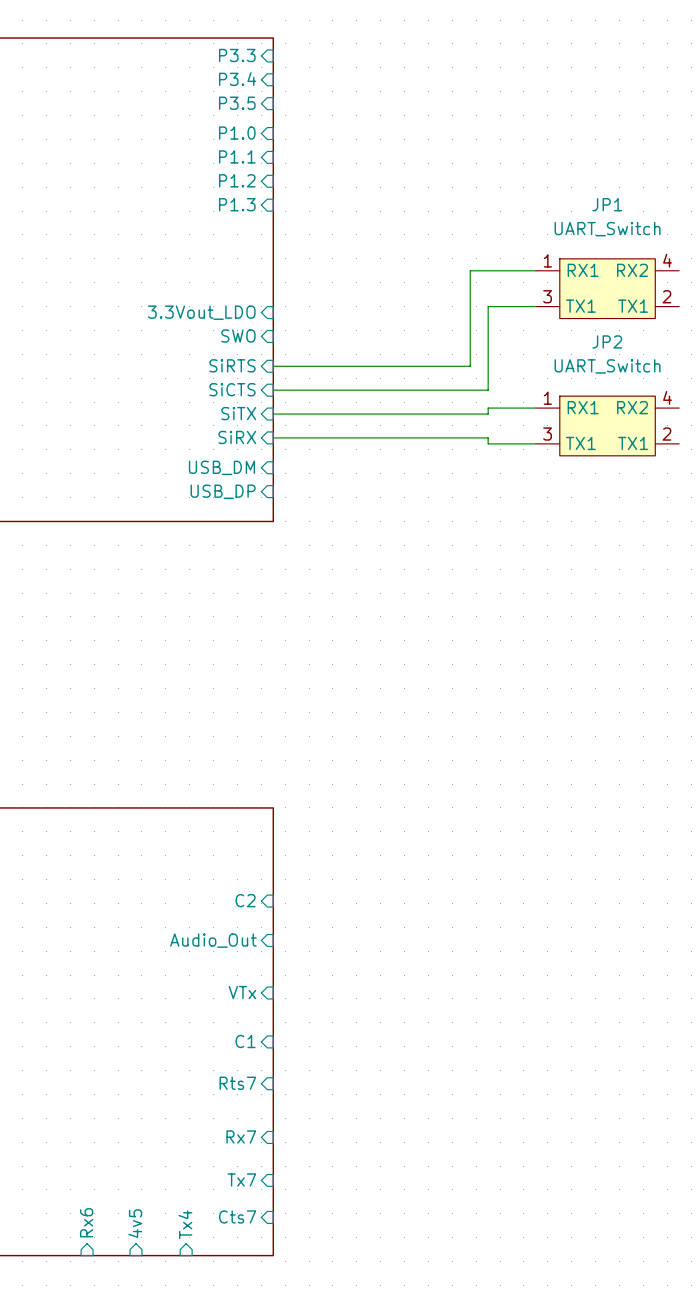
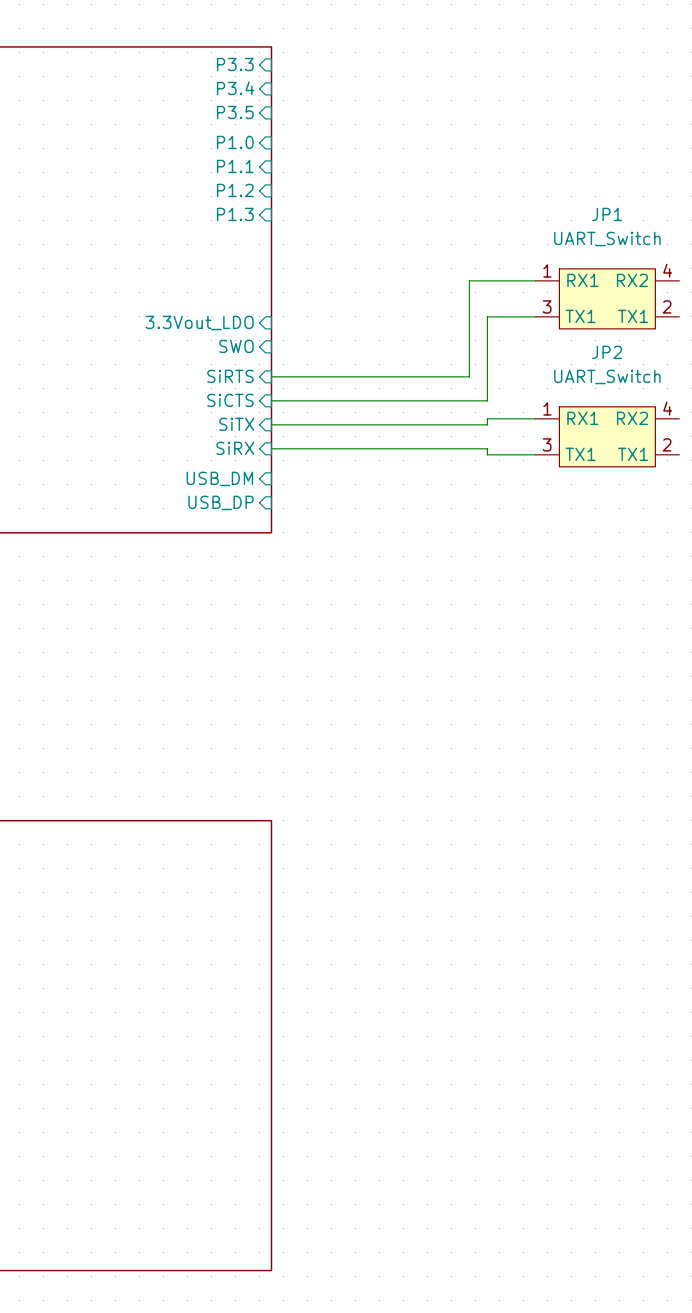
sheet pin: C2 (245, 900) -> none
sheet pin: Audio_Out (213, 940) -> none
sheet pin: VTx (242, 992) -> none
sheet pin: C1 (245, 1041) -> none
sheet pin: Rts7 (237, 1083) -> none
sheet pin: Rx7 (241, 1136) -> none
sheet pin: Tx7 (241, 1179) -> none
sheet pin: Cts7 (237, 1216) -> none
sheet pin: Rx6 (86, 1222) -> none
sheet pin: 4v5 (135, 1223) -> none
sheet pin: Tx4 (185, 1224) -> none

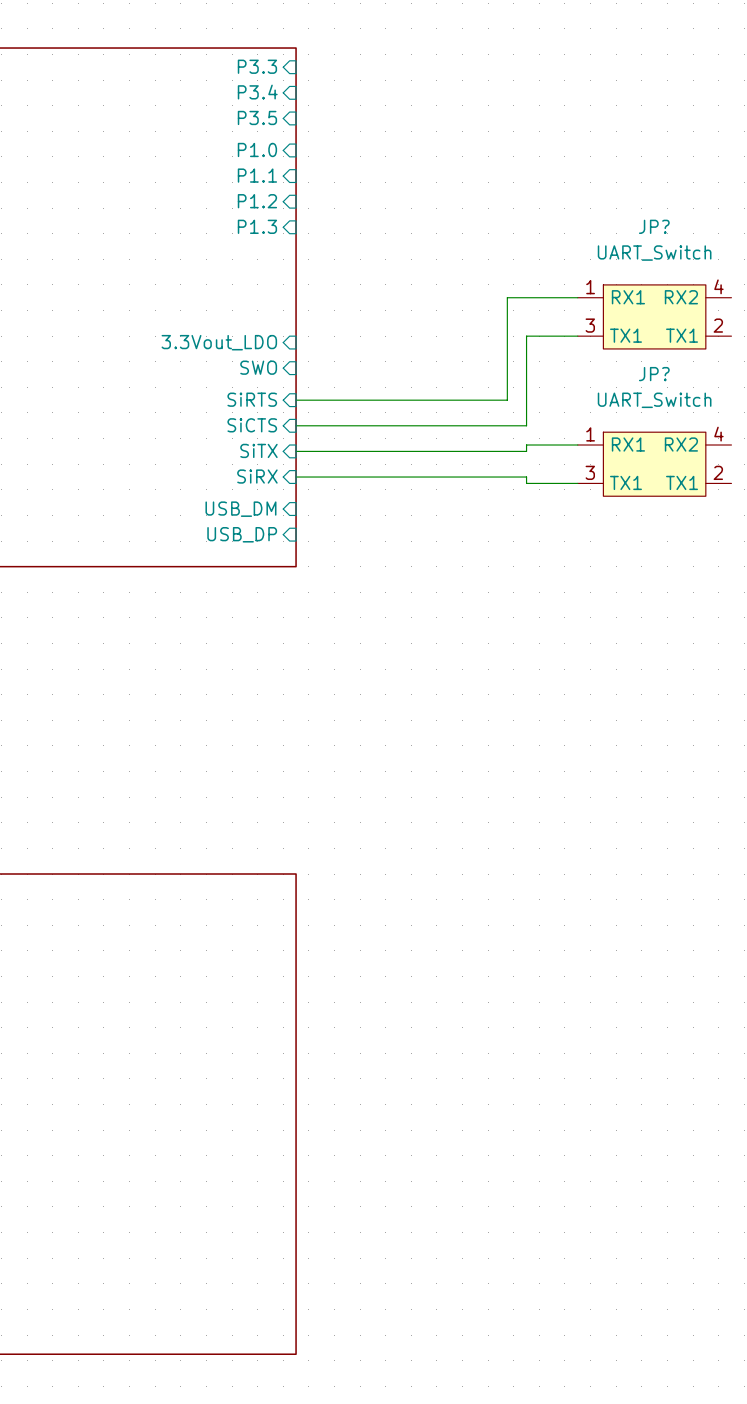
JP1 name: JP1 (607, 214) -> JP? (654, 226)
JP2 name: JP2 (607, 352) -> JP? (654, 374)

